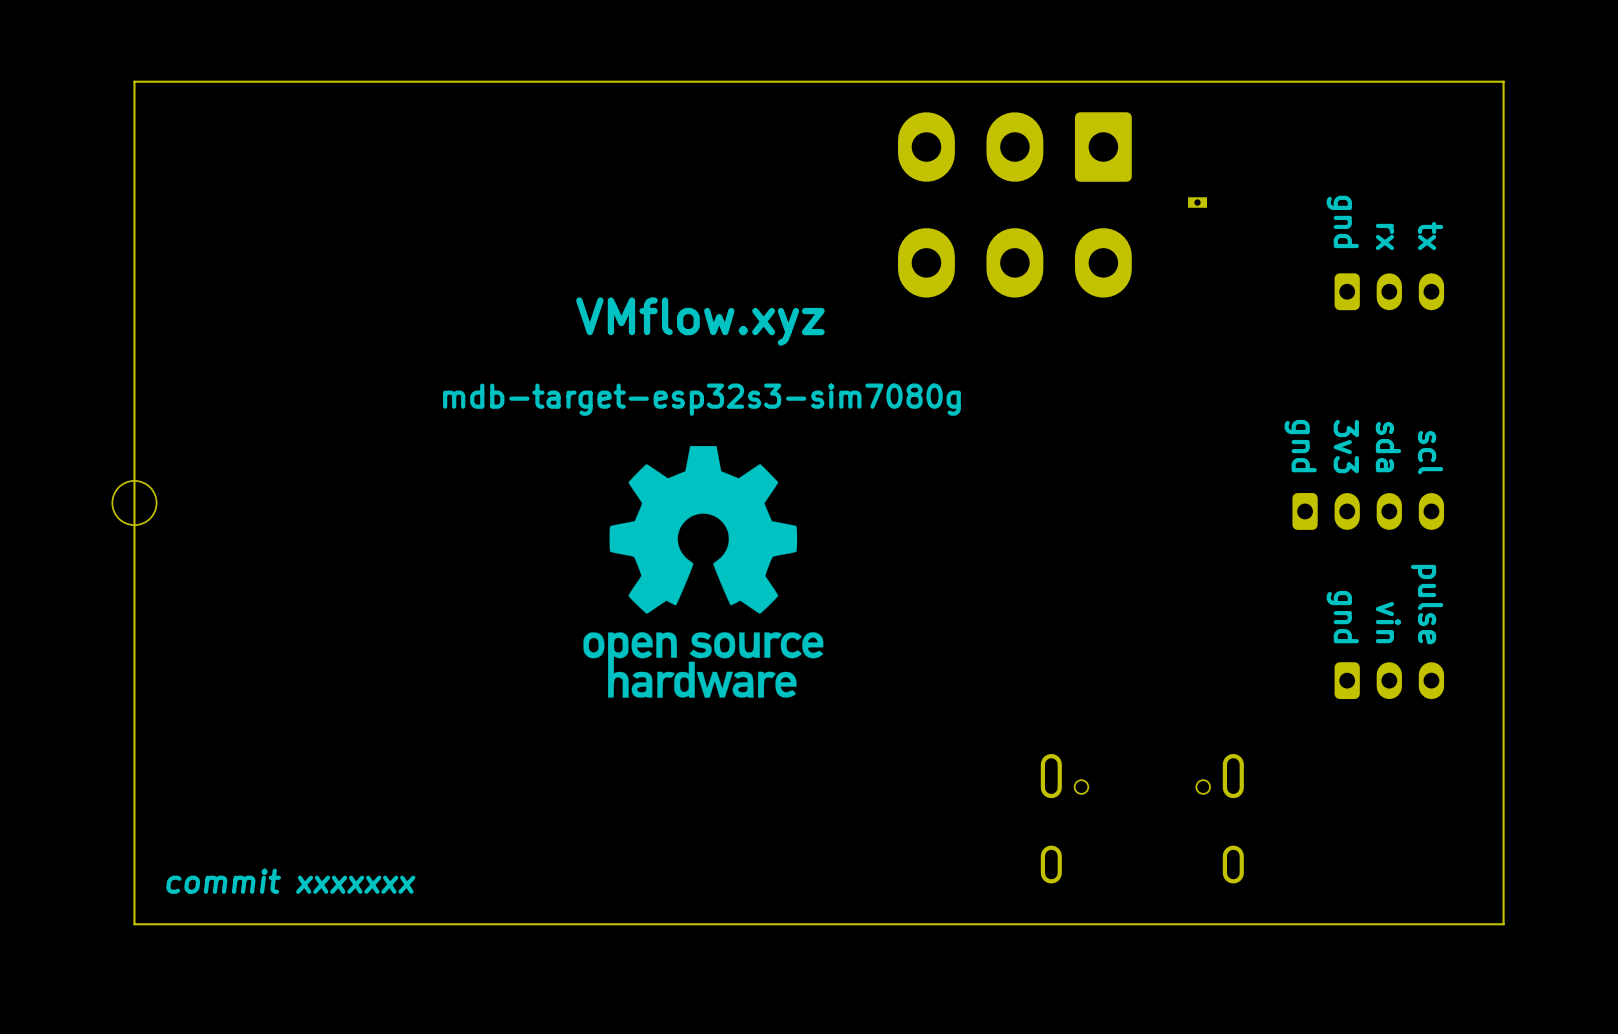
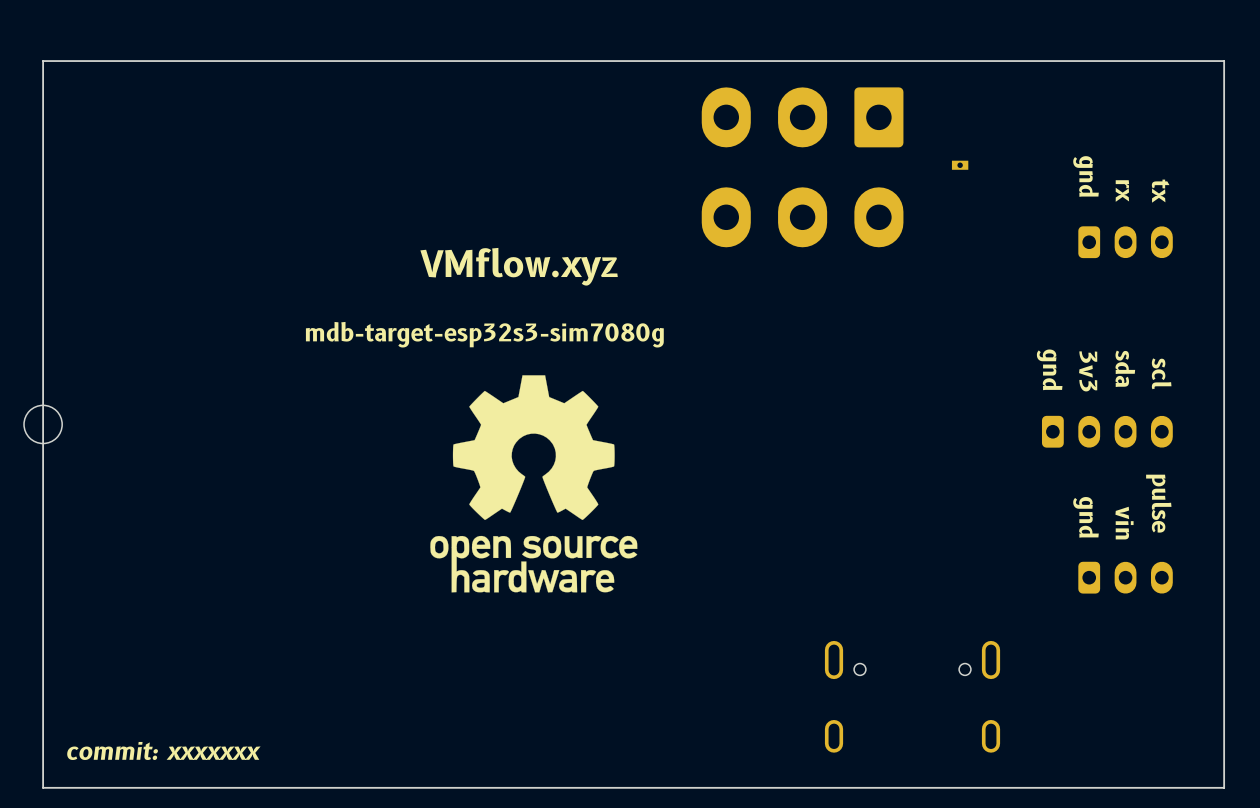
text: commit xxxxxxx (290, 881) -> commit: xxxxxxx (163, 750)

